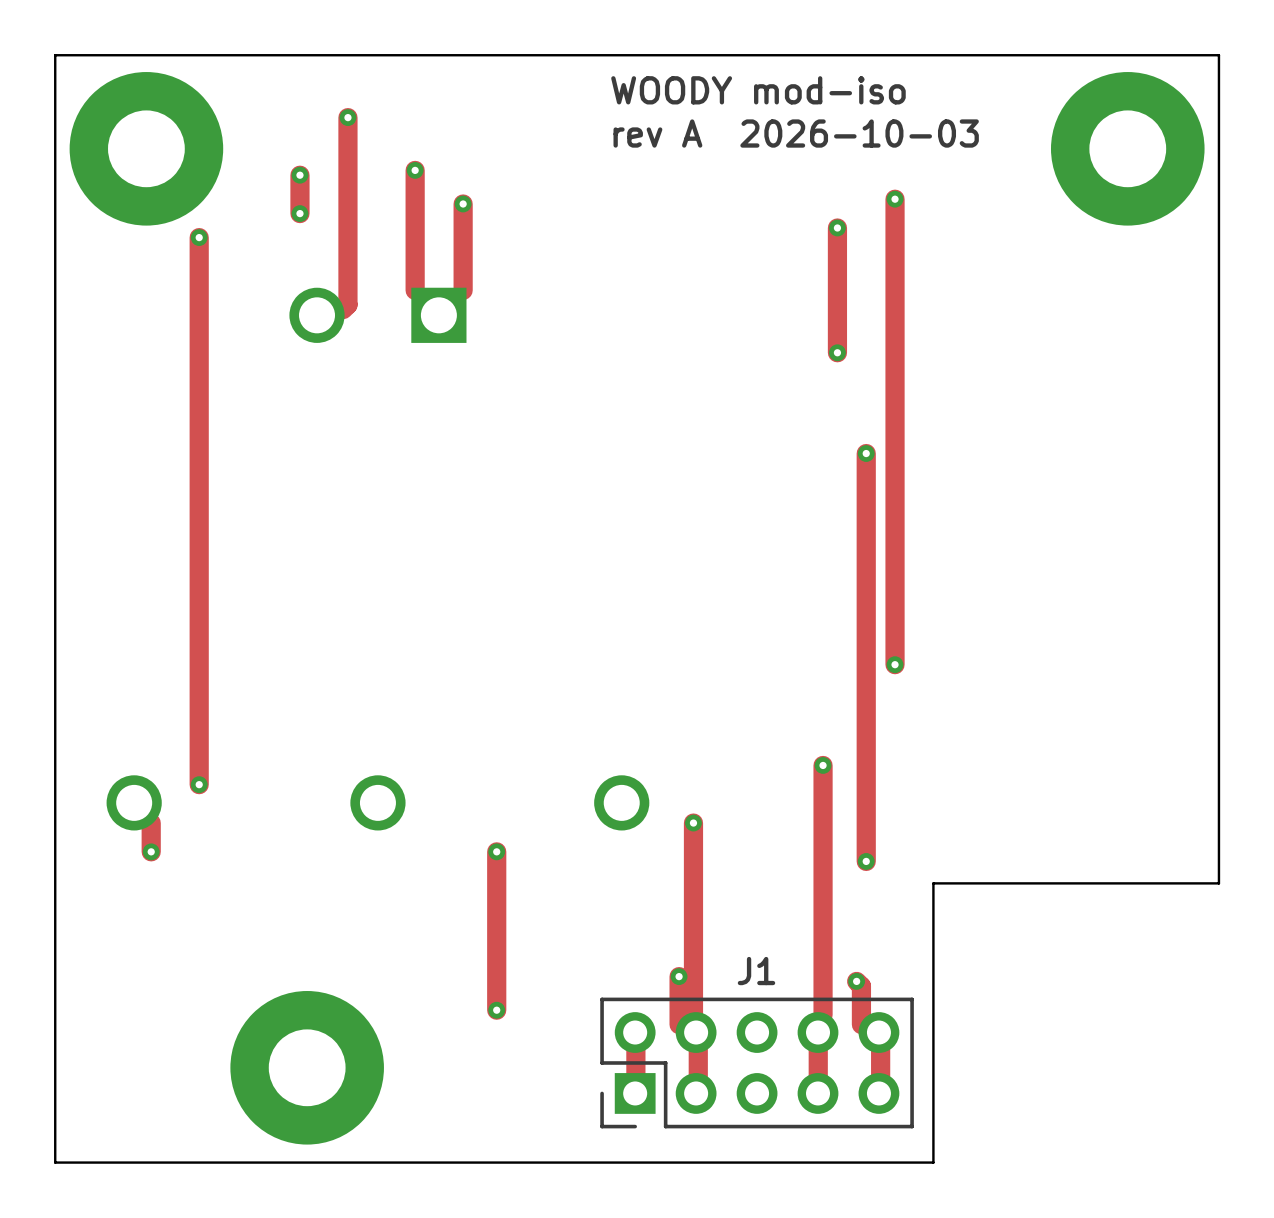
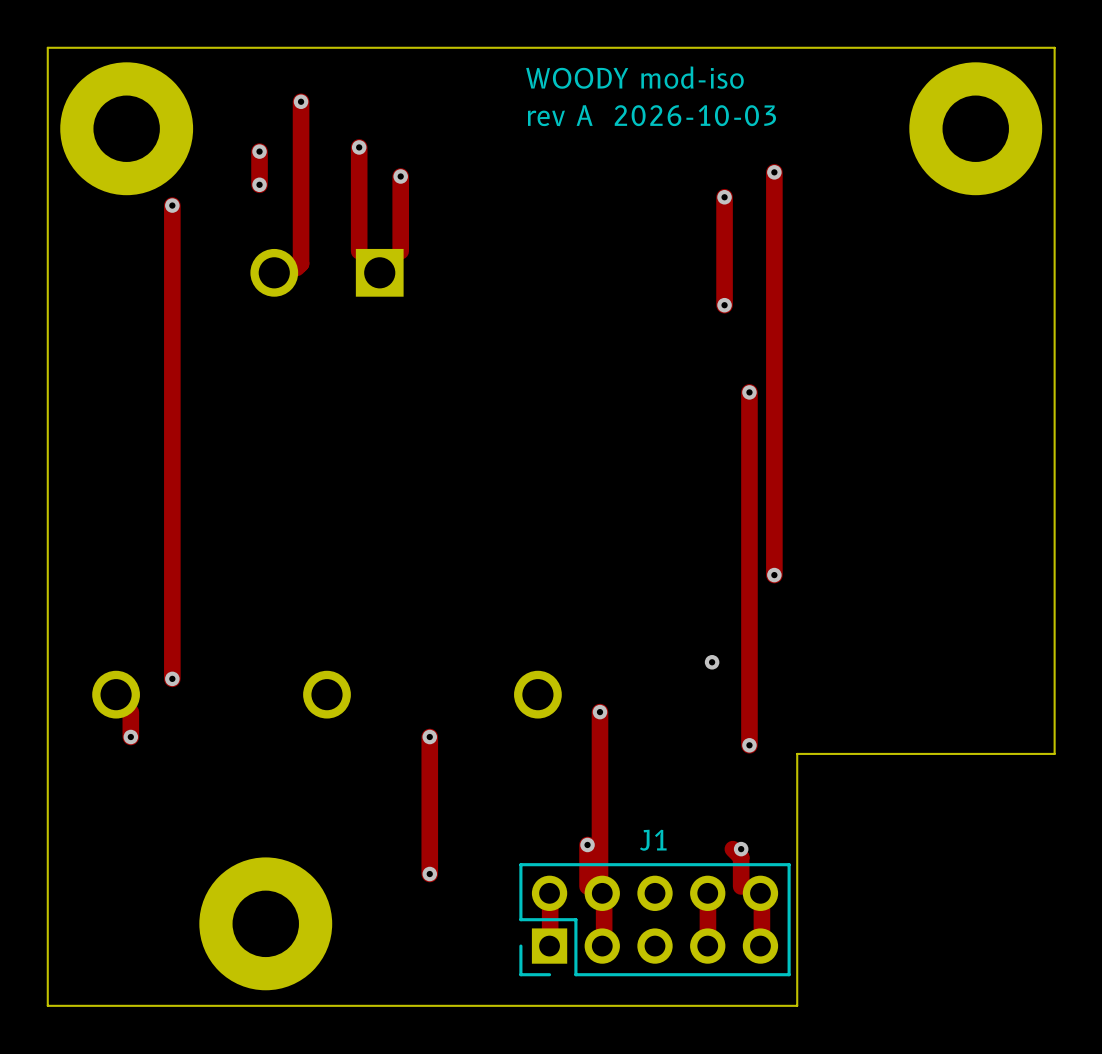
track: (823, 765) (823, 1015) -> none
board edge: (1218, 871) (1218, 883) (933, 883) (933, 1162) (921, 1162) -> (1054, 753) (797, 753) (797, 1005)
track: none -> (732, 849) (741, 857) (741, 886)
track: (856, 981) (861, 986) (861, 1024) -> none

